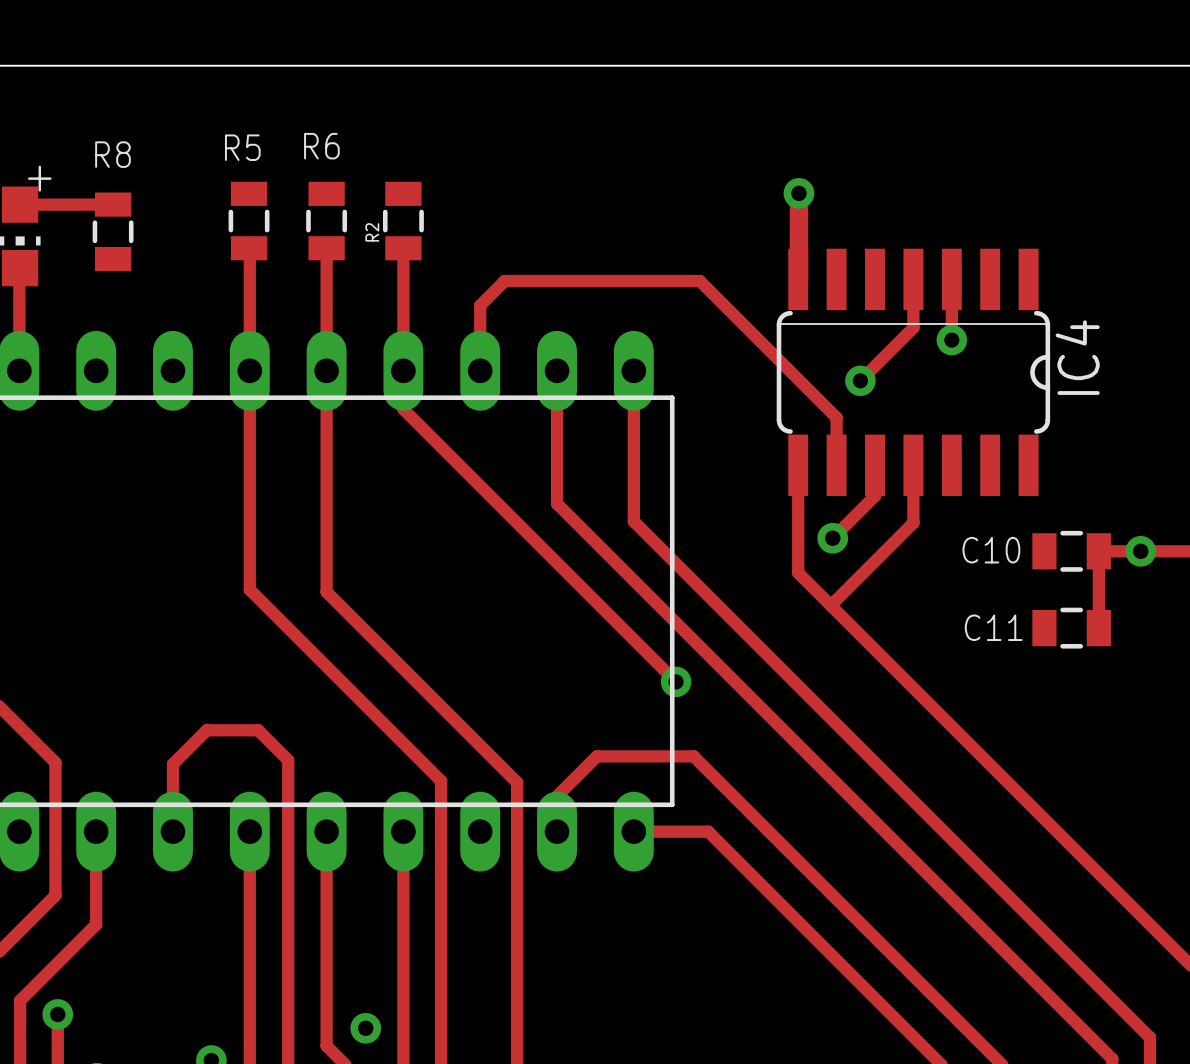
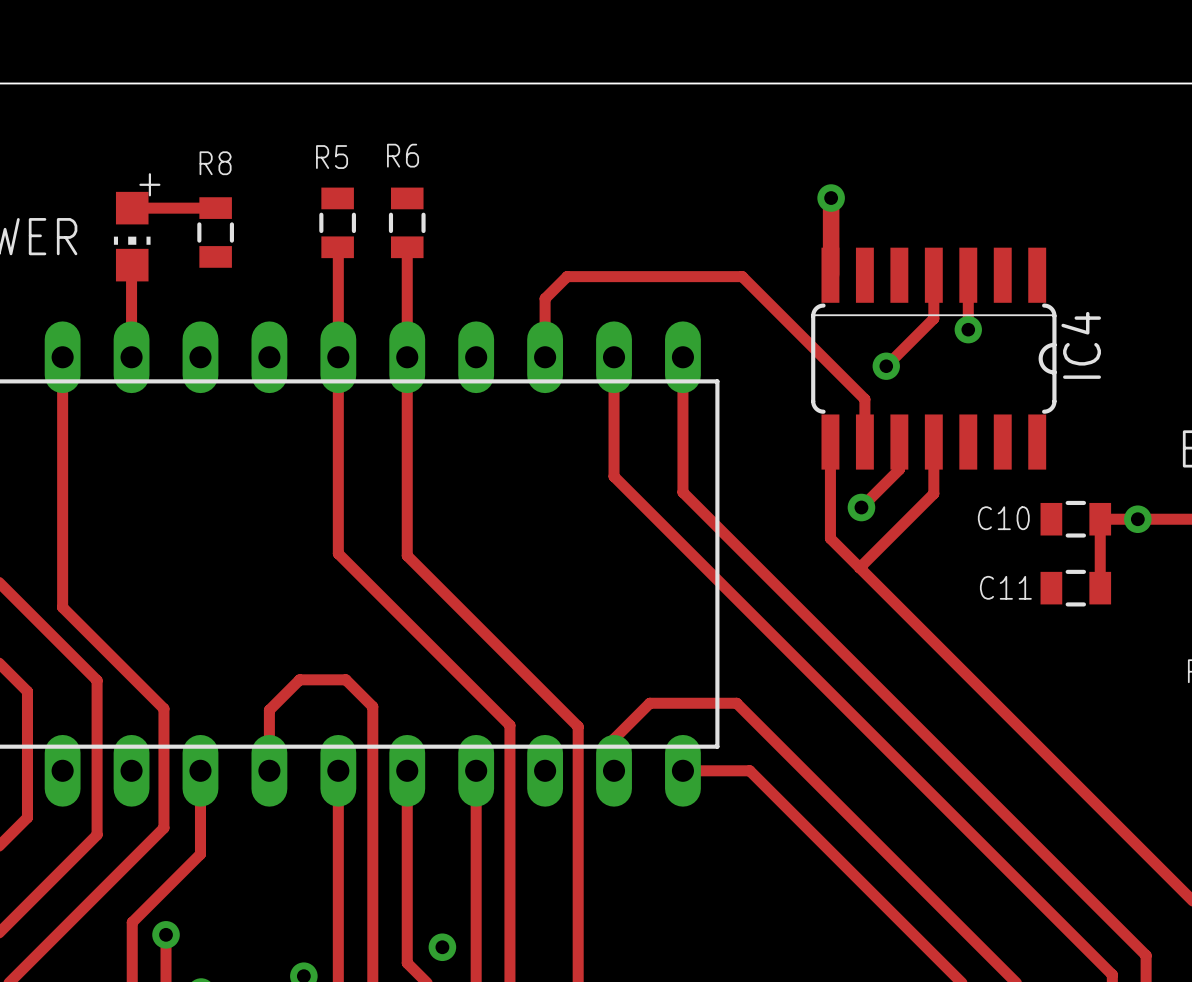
R2: (403, 221) -> none
track: (403, 248) (403, 409) (676, 681) -> none
via: (676, 681) -> none

